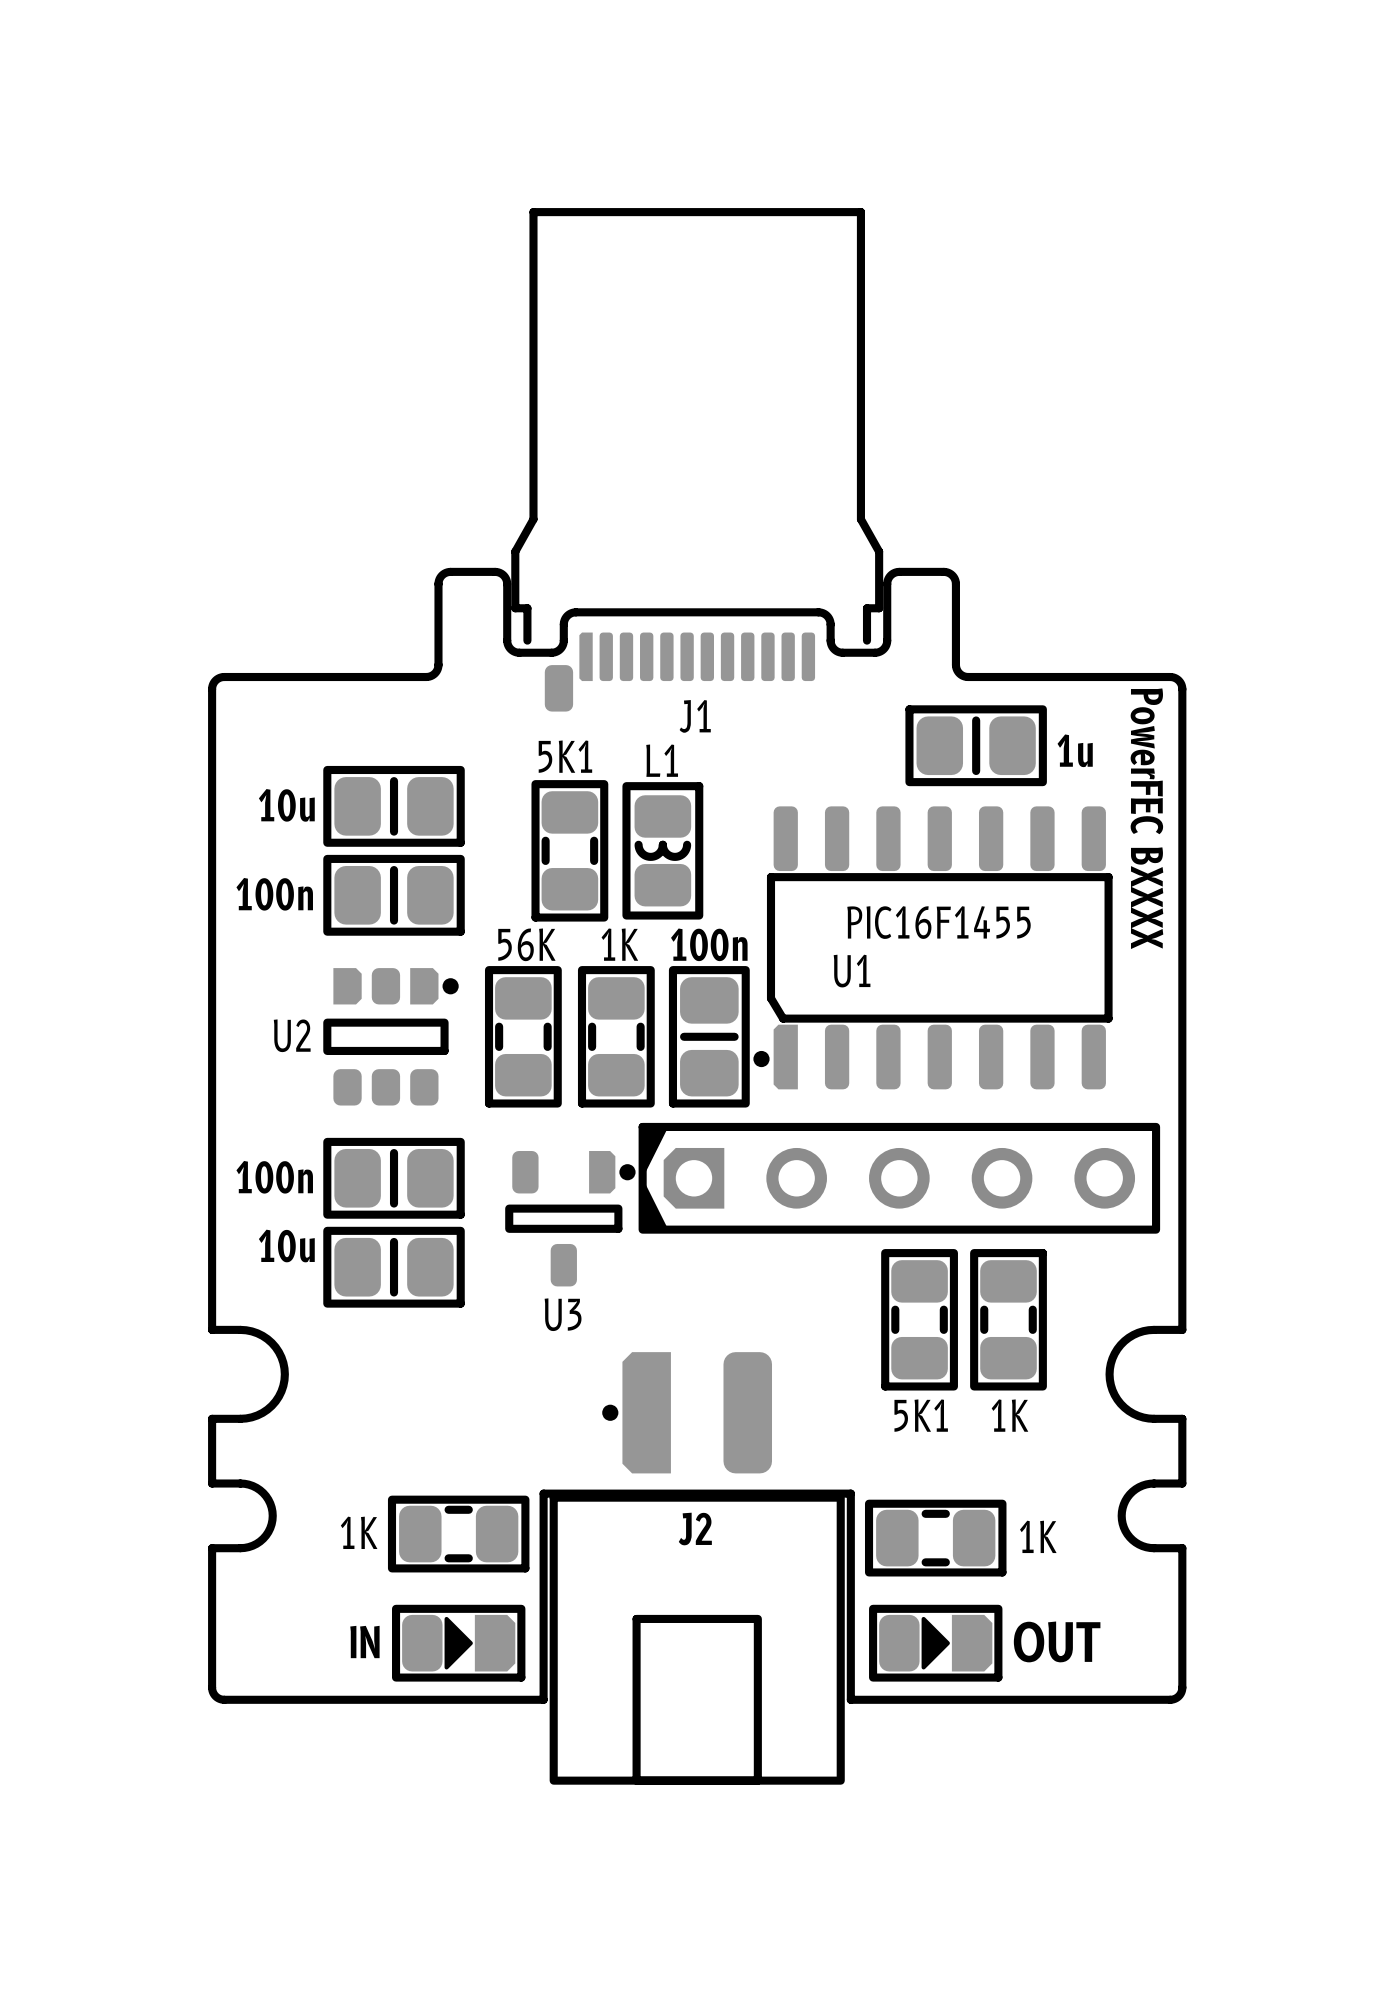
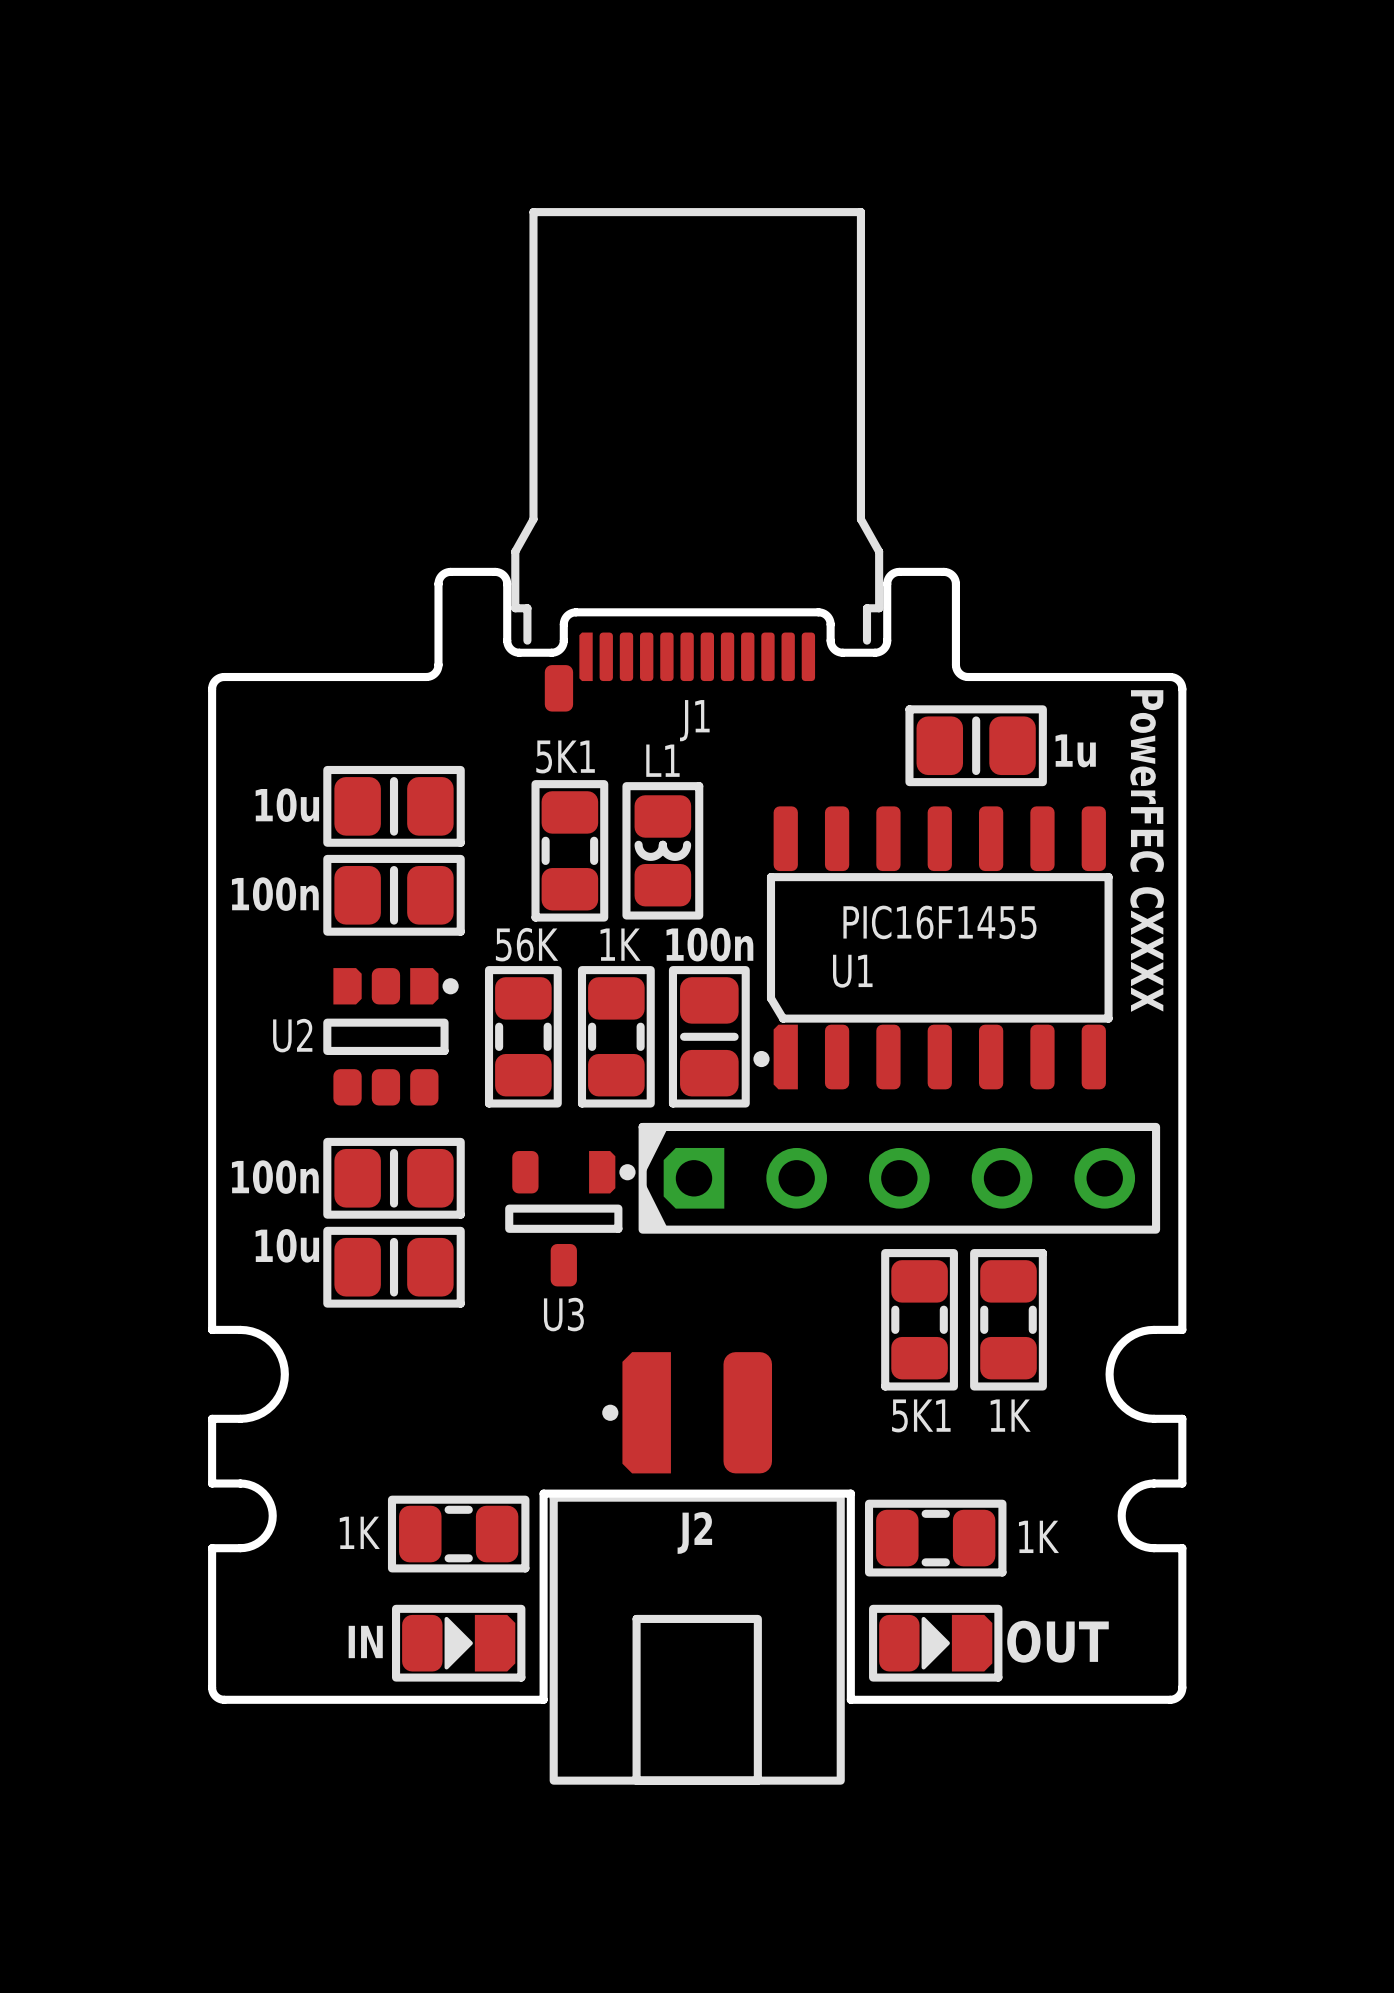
text: PowerFEC BXXXX (1146, 818) -> PowerFEC CXXXX (1147, 851)

